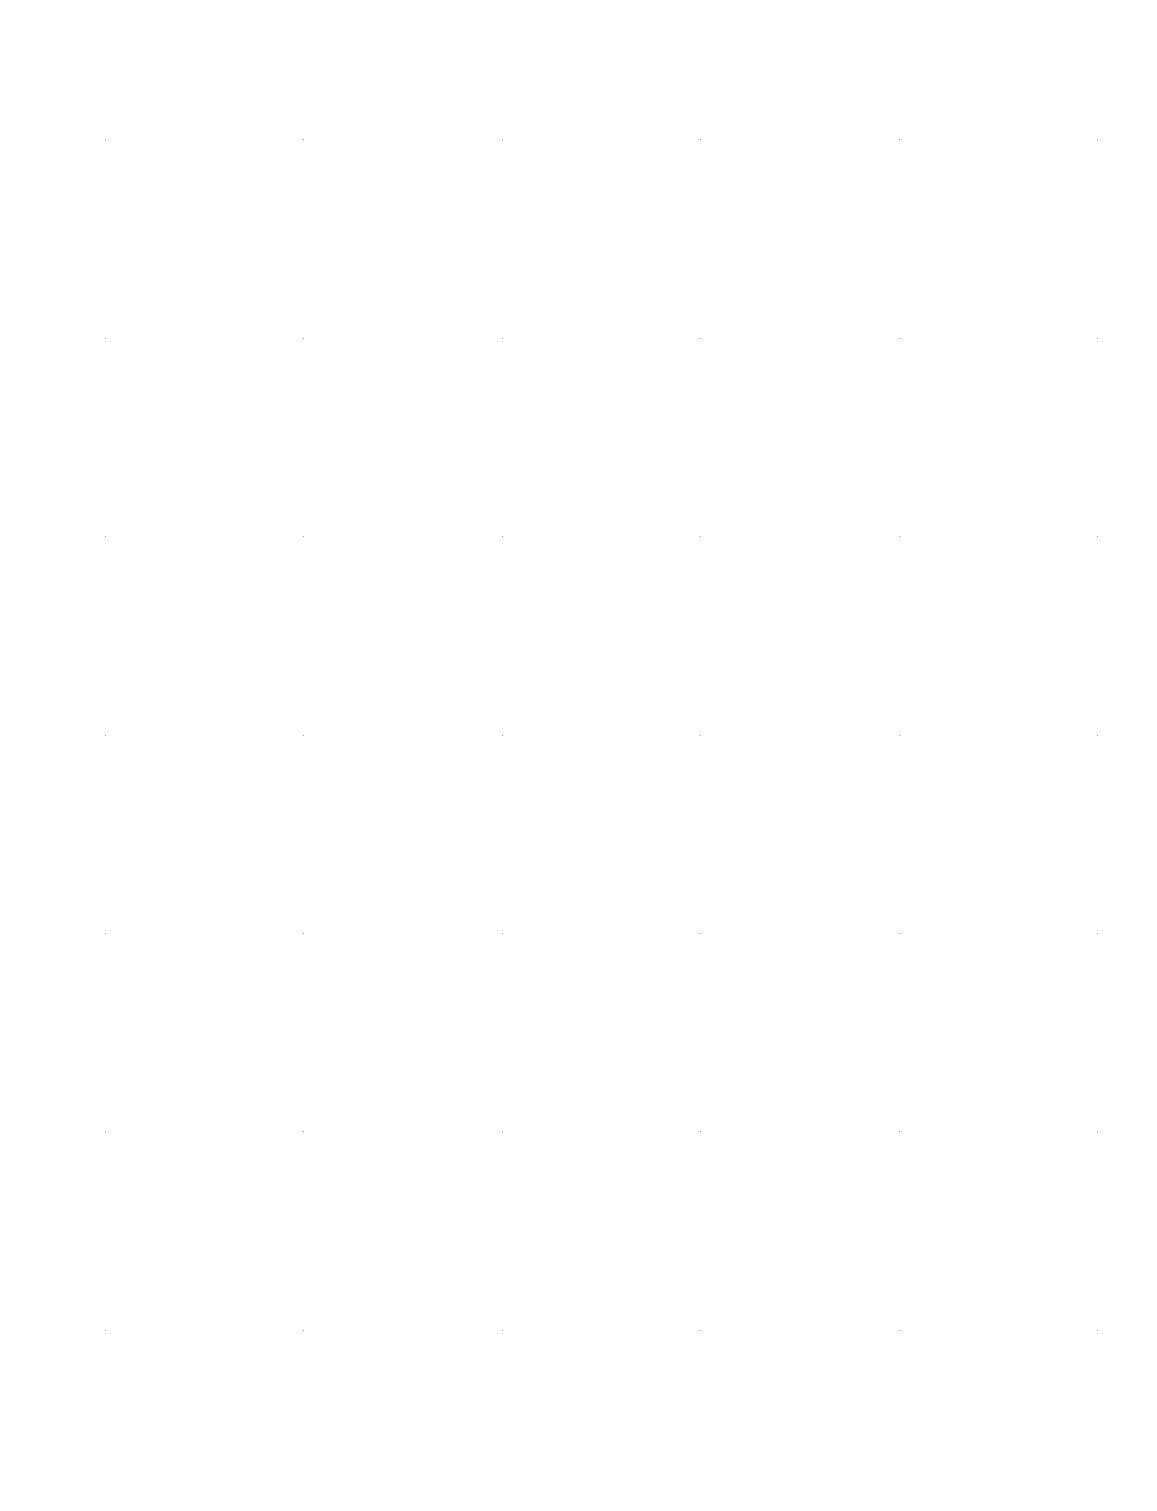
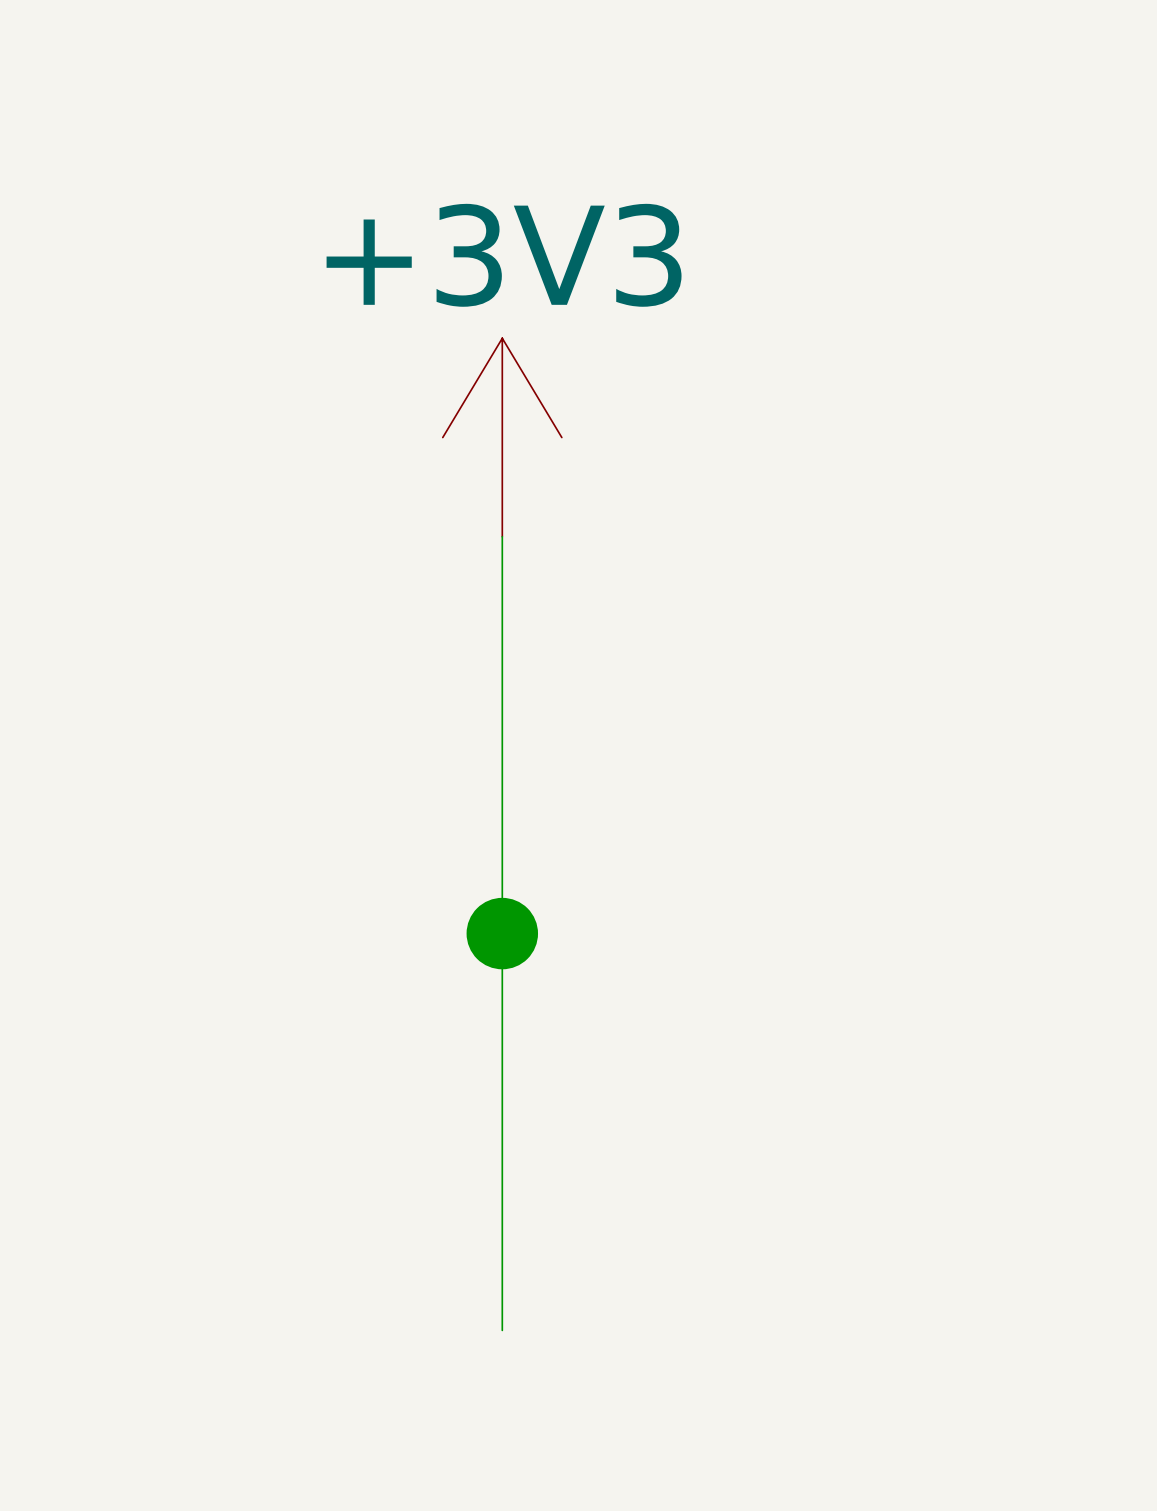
power symbol: none -> +3V3 (502, 437)
wire: none -> (502, 536) (502, 1330)
junction: none -> (502, 933)

